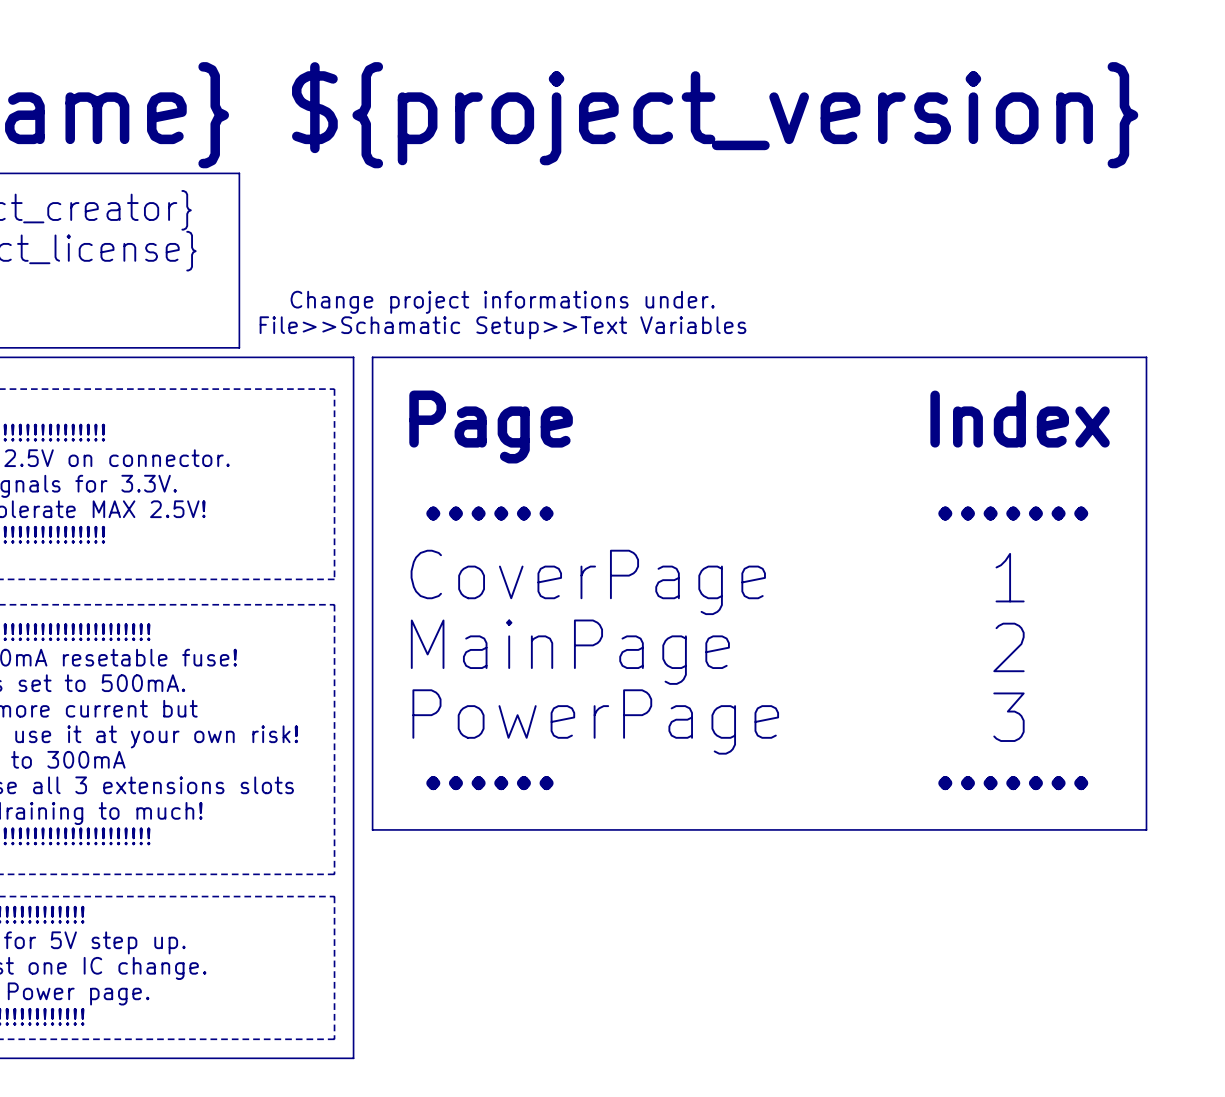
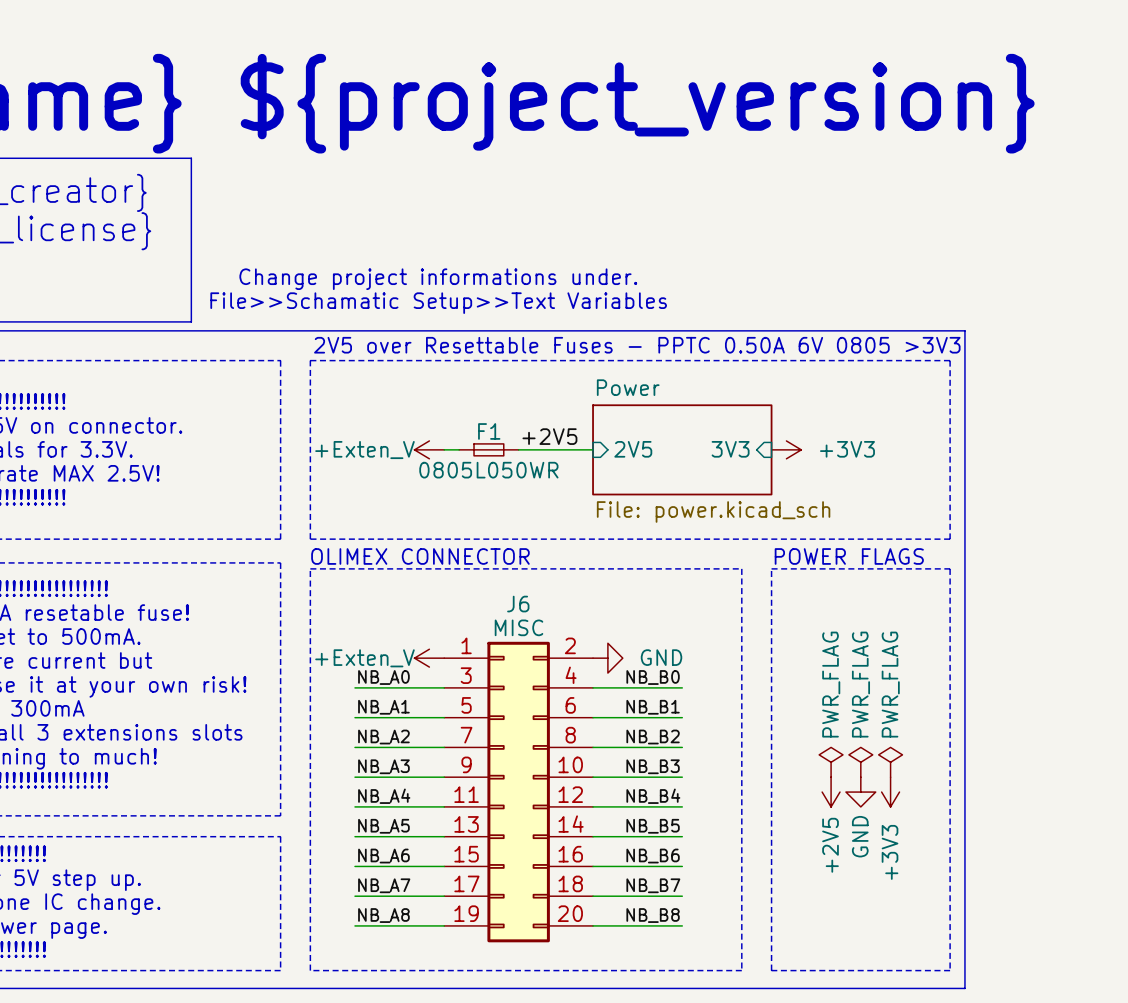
line: (353, 357) (353, 1058) -> (298, 330) (316, 330)
line: (372, 357) (372, 829) (1146, 829) (1146, 357) (1064, 357) -> (298, 988) (964, 988) (964, 330)
text: none -> 2V5 over Resettable Fuses - PPTC 0.50A 6V 0805 >3V3 (637, 345)
line: none -> (310, 360) (950, 360) (950, 539) (310, 539) (310, 360)
text: Index (1020, 419) -> none
text: Page (491, 427) -> none
label: none -> +2V5 (549, 436)
sheet pin: none -> 2V5 (633, 449)
sheet pin: none -> 3V3 (730, 449)
power symbol: none -> +Exten_V (429, 449)
wire: none -> (444, 449) (459, 449)
F1: none -> 0805L050WR (488, 449)
wire: none -> (518, 449) (593, 449)
sheet Power: none -> File: power.kicad_sch (682, 449)
power symbol: none -> +3V3 (786, 449)
text: ...... (489, 513) -> none
text: ....... (1013, 513) -> none
text: 1 (1010, 577) -> none
text: CoverPage (588, 582) -> none
text: none -> OLIMEX CONNECTOR (420, 556)
text: none -> POWER FLAGS (849, 556)
line: none -> (310, 568) (741, 568) (741, 970) (310, 970) (310, 568)
line: none -> (771, 568) (950, 568) (950, 970) (771, 970) (771, 568)
text: 2 (1008, 647) -> none
text: MainPage (570, 652) -> none
power symbol: none -> +Exten_V (429, 658)
power symbol: none -> GND (607, 658)
text: 3 (1008, 717) -> none
text: PowerPage (595, 721) -> none
label: none -> NB_A0 (383, 677)
label: none -> NB_B0 (653, 677)
wire: none -> (354, 687) (444, 687)
wire: none -> (593, 687) (682, 687)
label: none -> NB_A1 (383, 707)
label: none -> NB_B1 (653, 707)
wire: none -> (354, 717) (444, 717)
wire: none -> (593, 717) (682, 717)
text: ...... (489, 783) -> none
text: ....... (1013, 783) -> none
label: none -> NB_A2 (383, 737)
label: none -> NB_B2 (653, 737)
wire: none -> (354, 747) (444, 747)
wire: none -> (593, 747) (682, 747)
power symbol: none -> PWR_FLAG (831, 762)
power symbol: none -> PWR_FLAG (860, 762)
power symbol: none -> PWR_FLAG (890, 762)
label: none -> NB_A3 (383, 766)
label: none -> NB_B3 (653, 766)
wire: none -> (354, 777) (444, 777)
wire: none -> (593, 777) (682, 777)
J6: none -> MISC (518, 792)
power symbol: none -> +2V5 (831, 792)
power symbol: none -> GND (860, 792)
power symbol: none -> +3V3 (890, 792)
label: none -> NB_A4 (384, 796)
label: none -> NB_B4 (653, 796)
wire: none -> (354, 806) (444, 806)
wire: none -> (593, 806) (682, 806)
label: none -> NB_A5 (383, 826)
label: none -> NB_B5 (653, 826)
wire: none -> (354, 836) (444, 836)
wire: none -> (593, 836) (682, 836)
label: none -> NB_A6 (383, 856)
label: none -> NB_B6 (653, 856)
wire: none -> (354, 866) (444, 866)
wire: none -> (593, 866) (682, 866)
label: none -> NB_A7 (384, 885)
label: none -> NB_B7 (653, 885)
wire: none -> (354, 896) (444, 896)
wire: none -> (593, 896) (682, 896)
label: none -> NB_A8 (383, 915)
label: none -> NB_B8 (653, 915)
wire: none -> (354, 925) (444, 925)
wire: none -> (593, 925) (682, 925)

